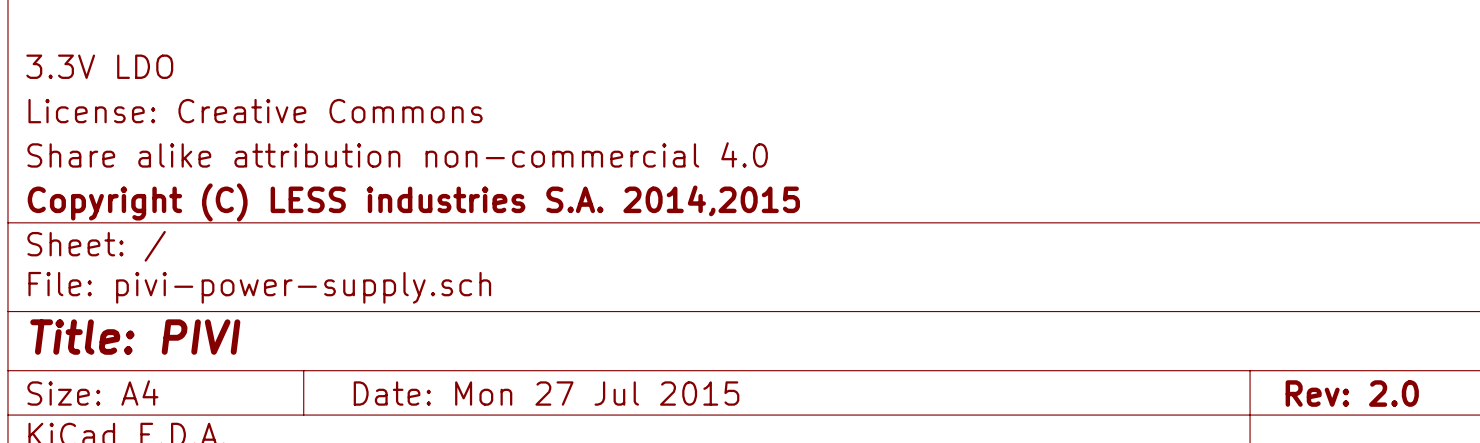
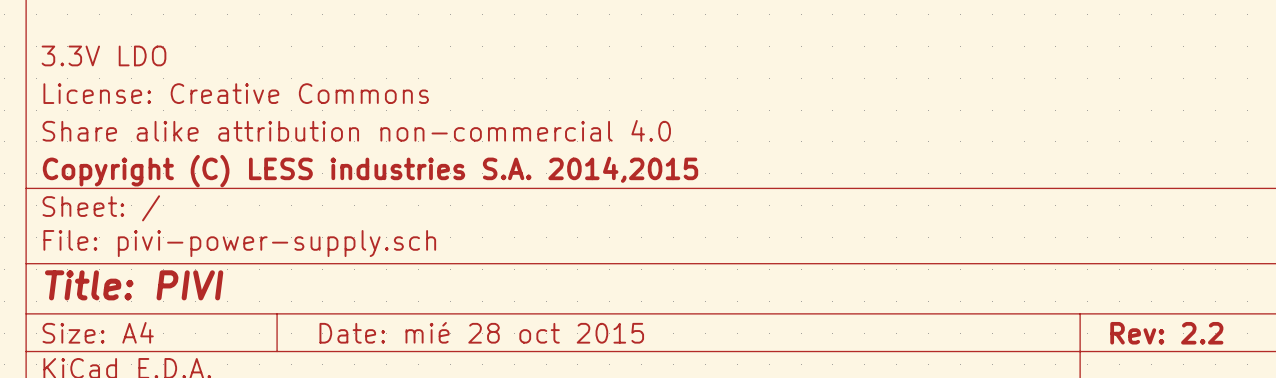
title block: Date: Mon 27 Jul 2015 (546, 393) -> Date: mié 28 oct 2015 (481, 332)
title block: Rev: 2.0 (1352, 393) -> Rev: 2.2 (1166, 333)

